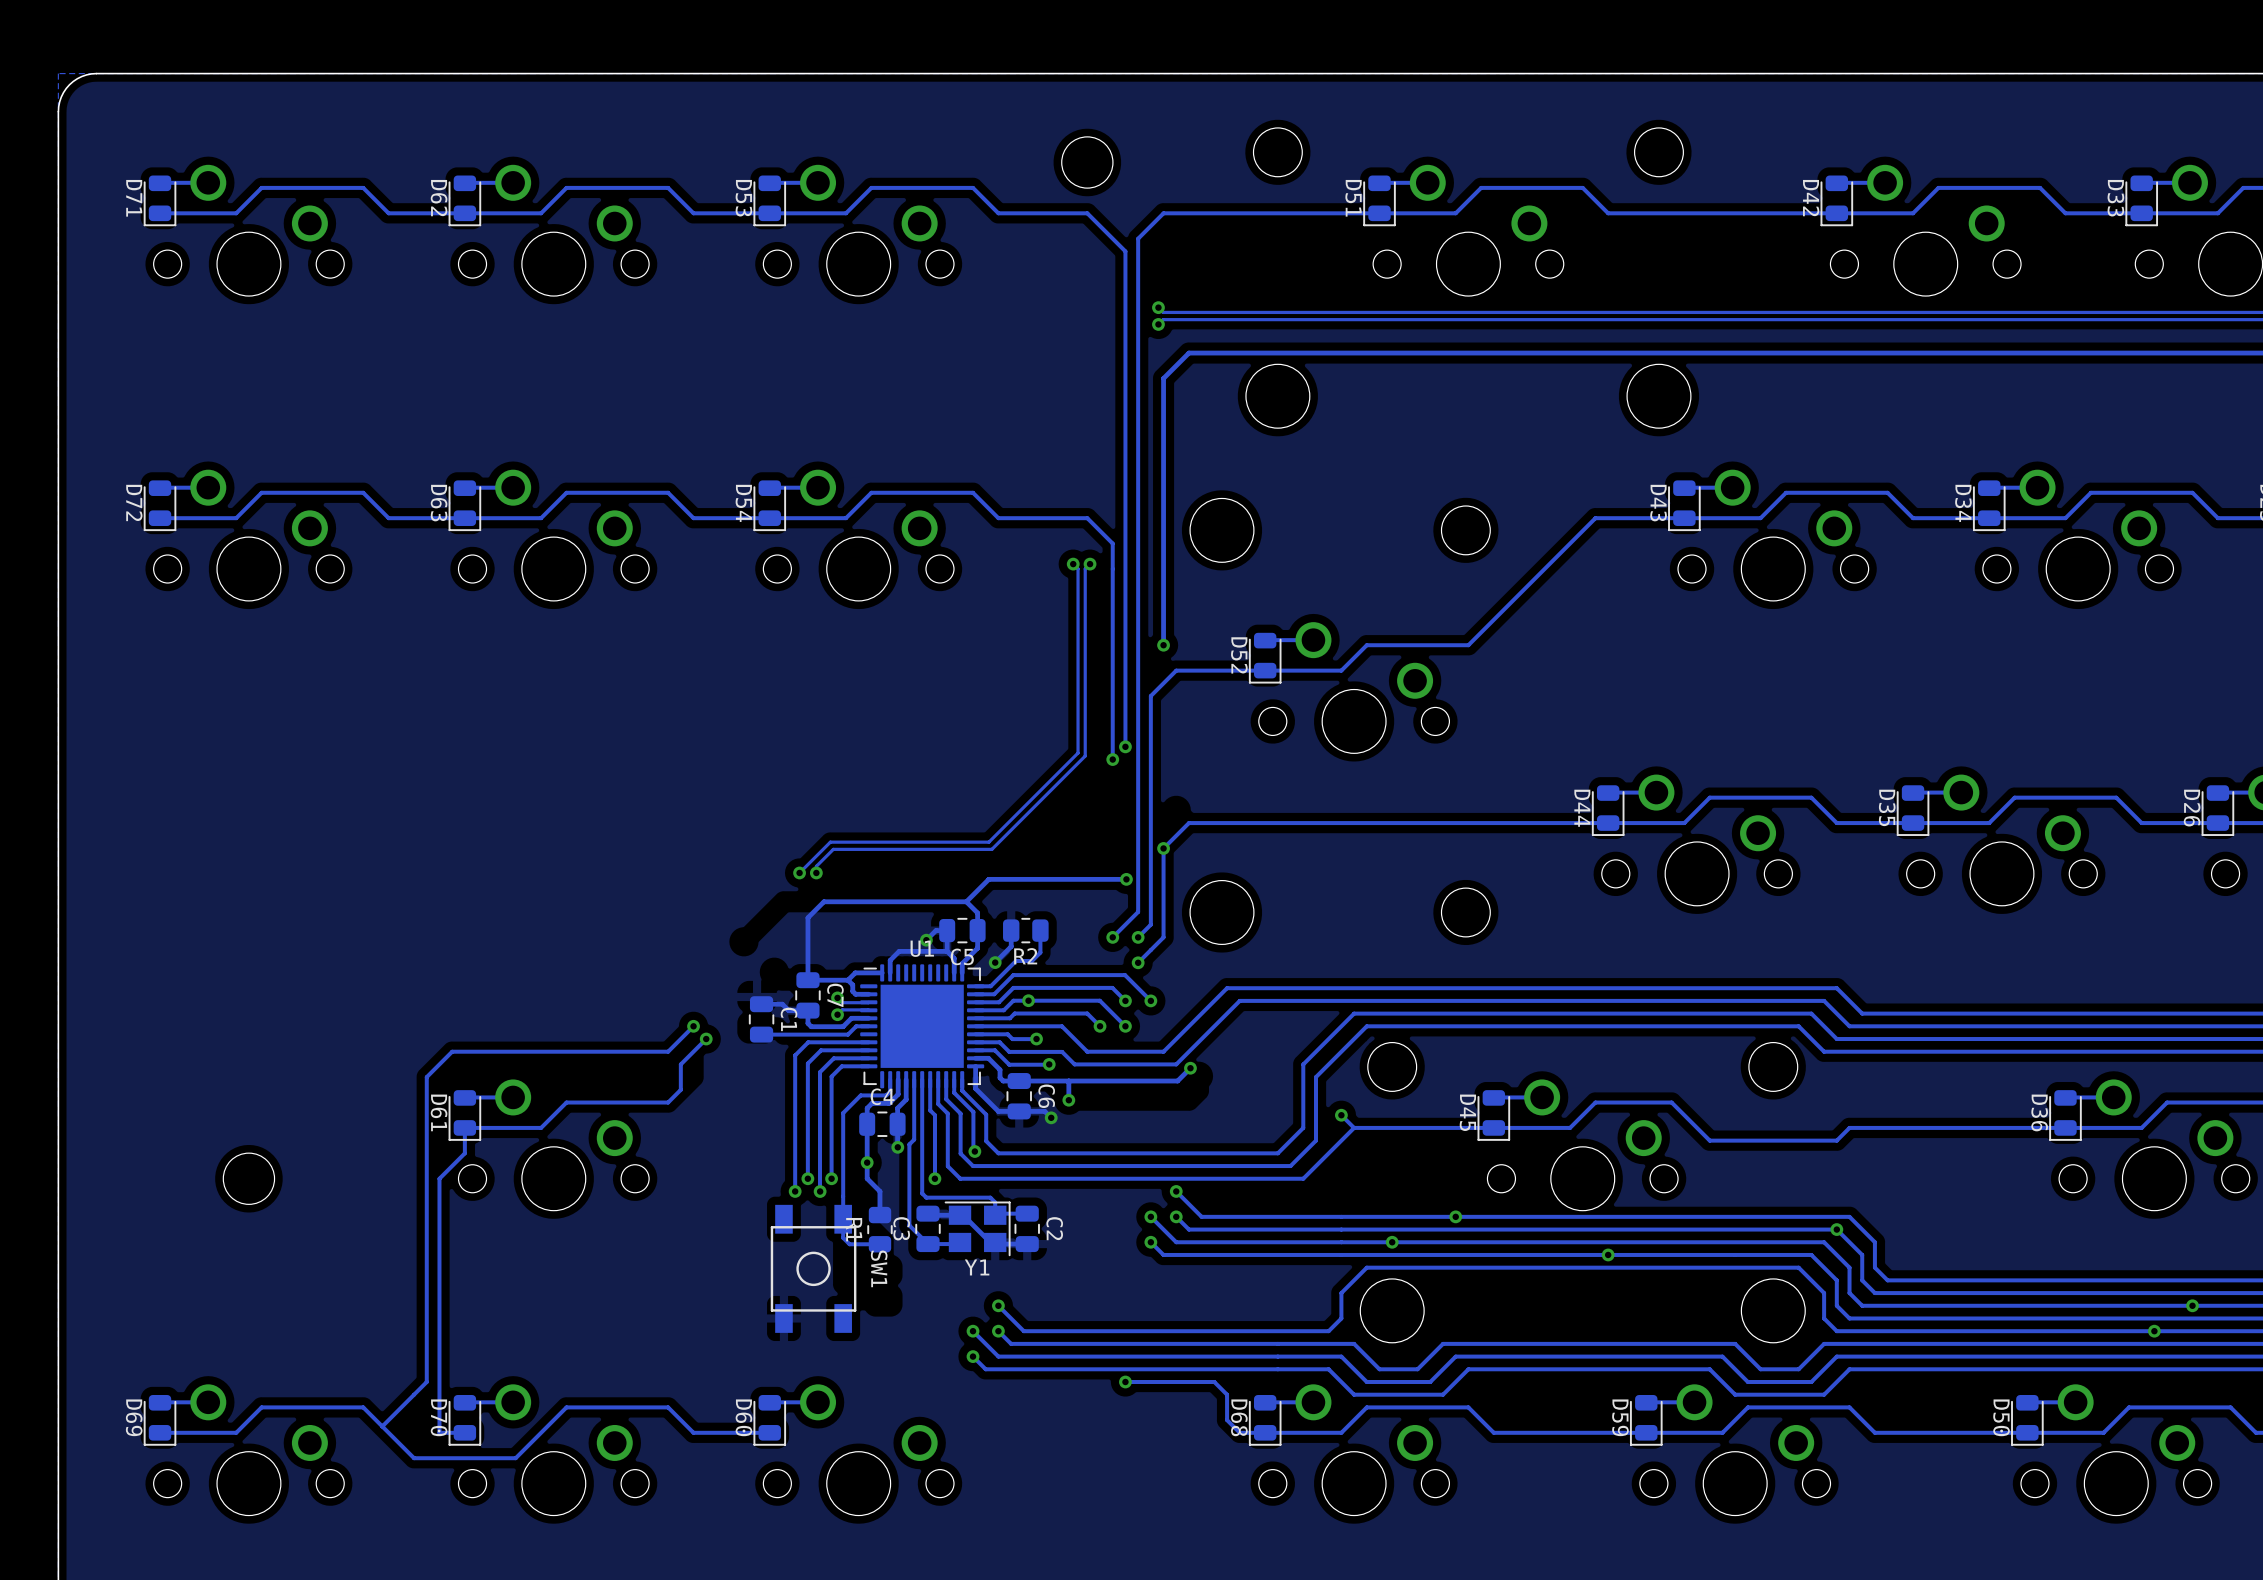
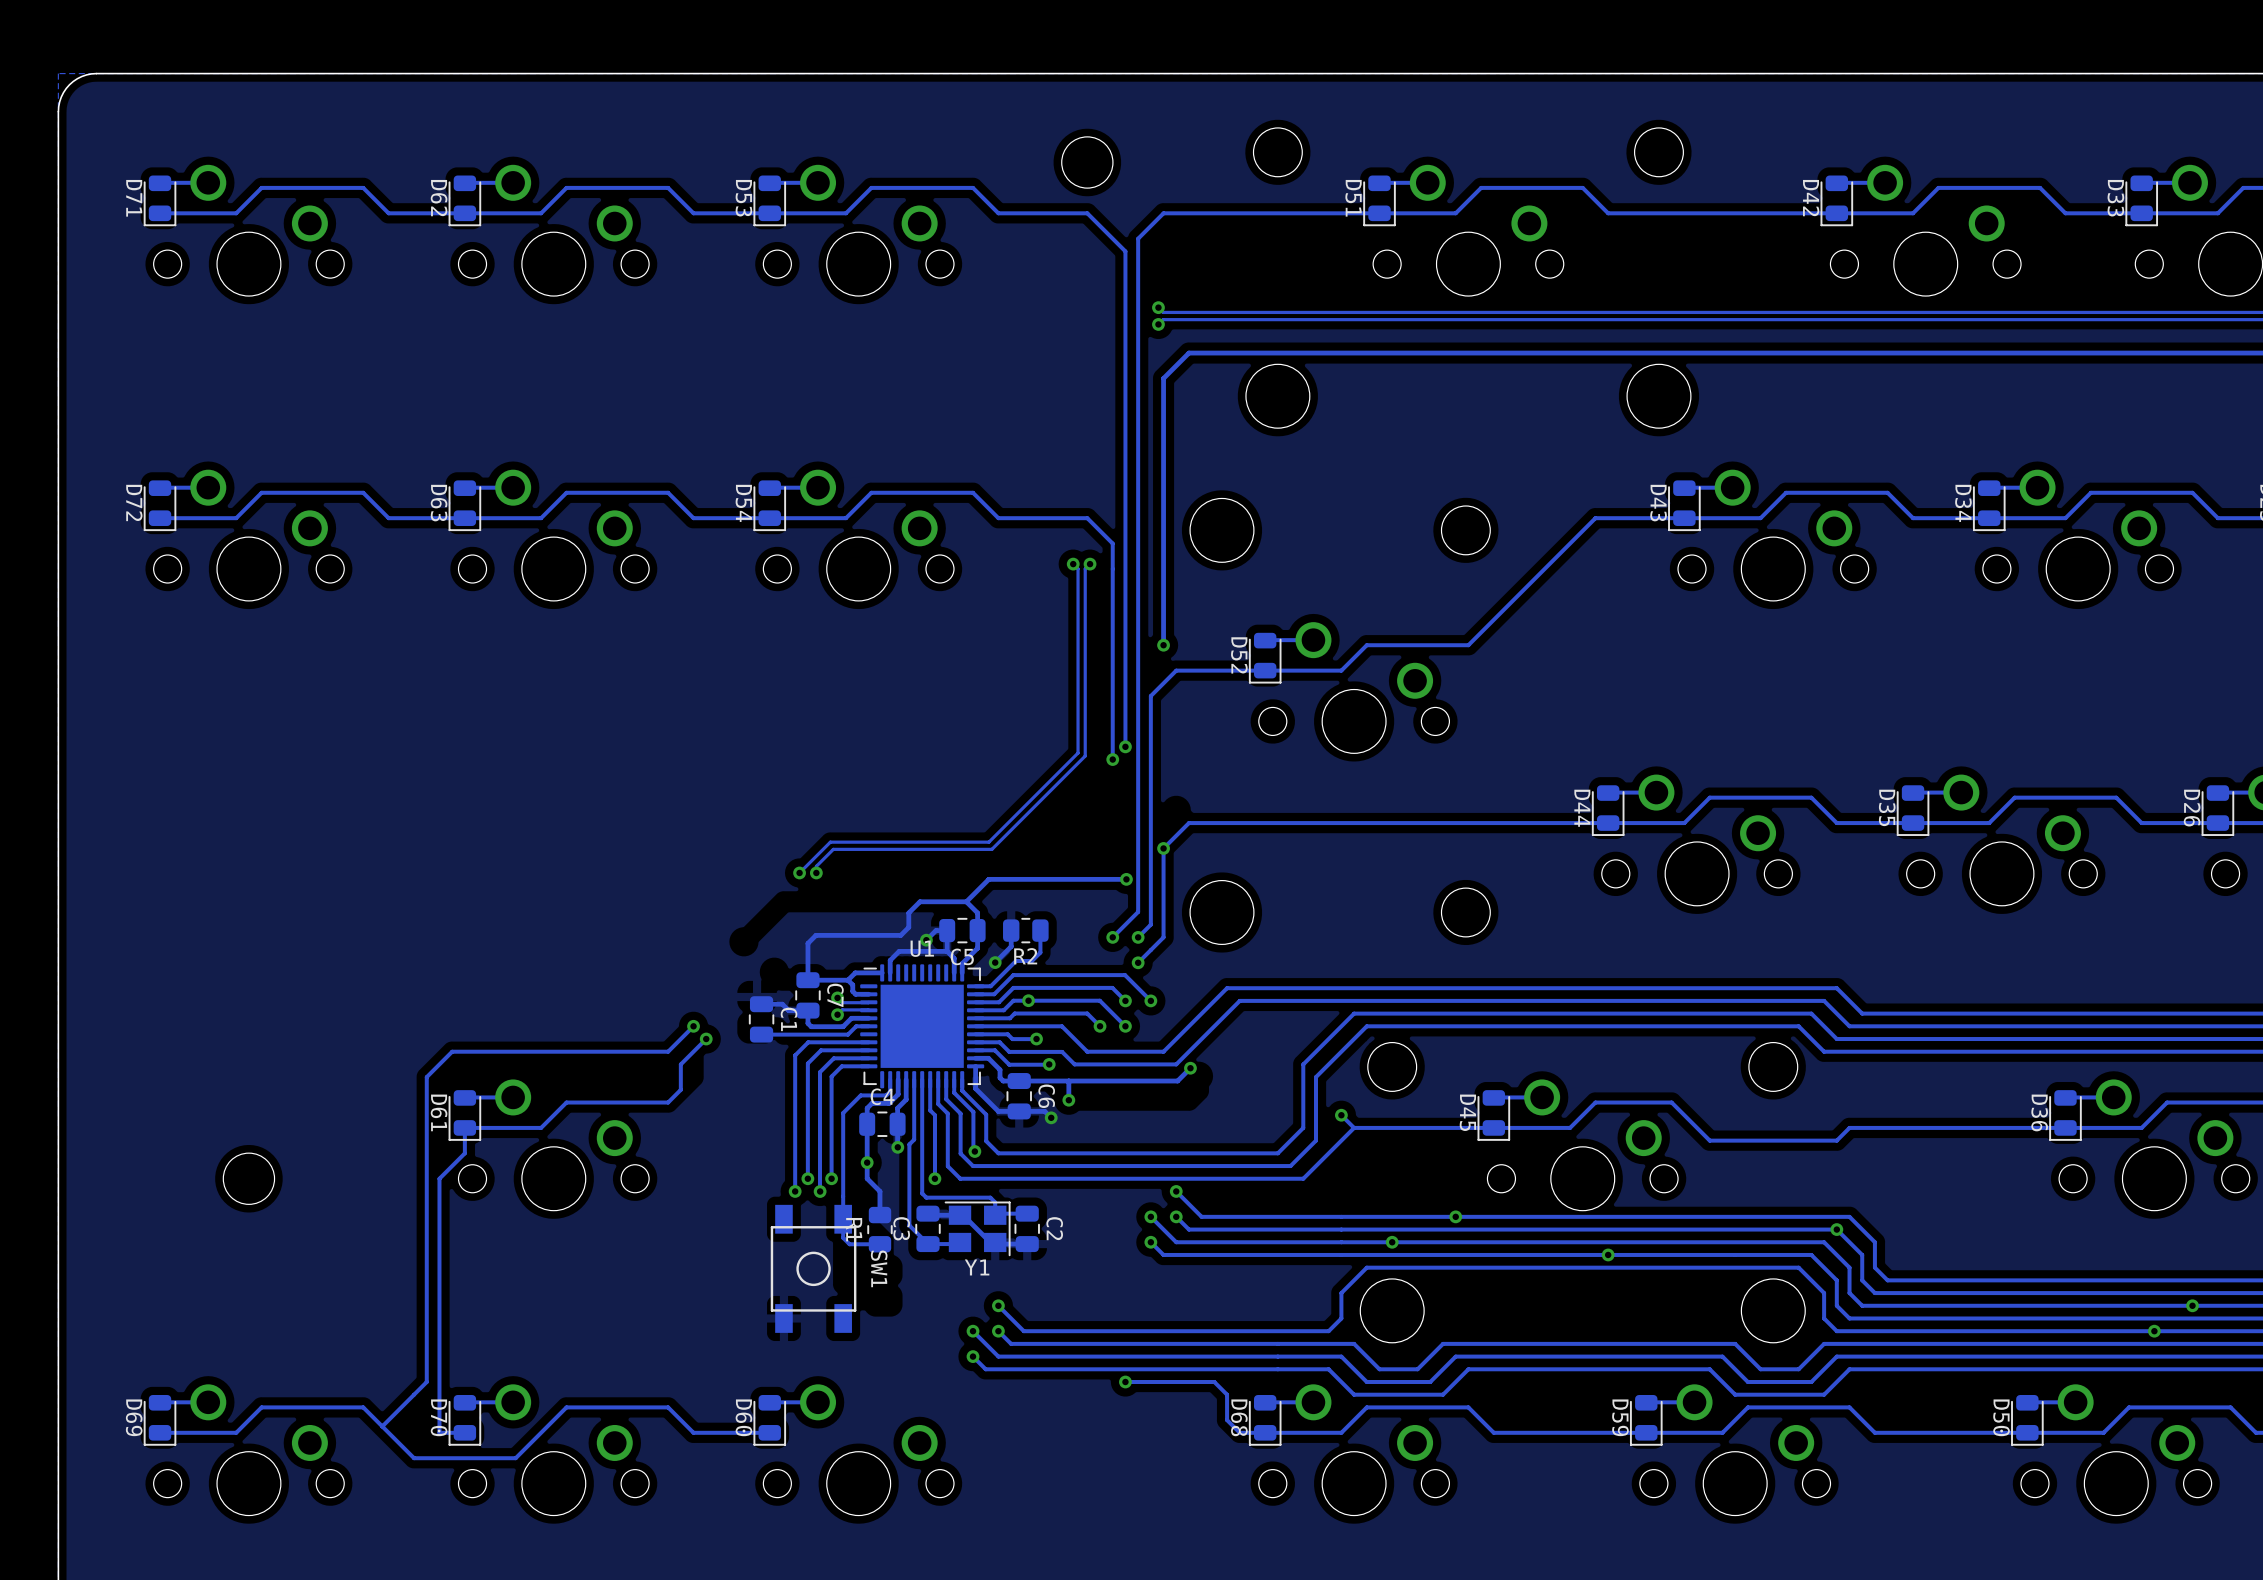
track: (919, 901) (823, 901) (807, 917) (807, 943) -> (919, 901) (908, 912) (908, 927) (900, 935) (815, 935) (807, 943)

